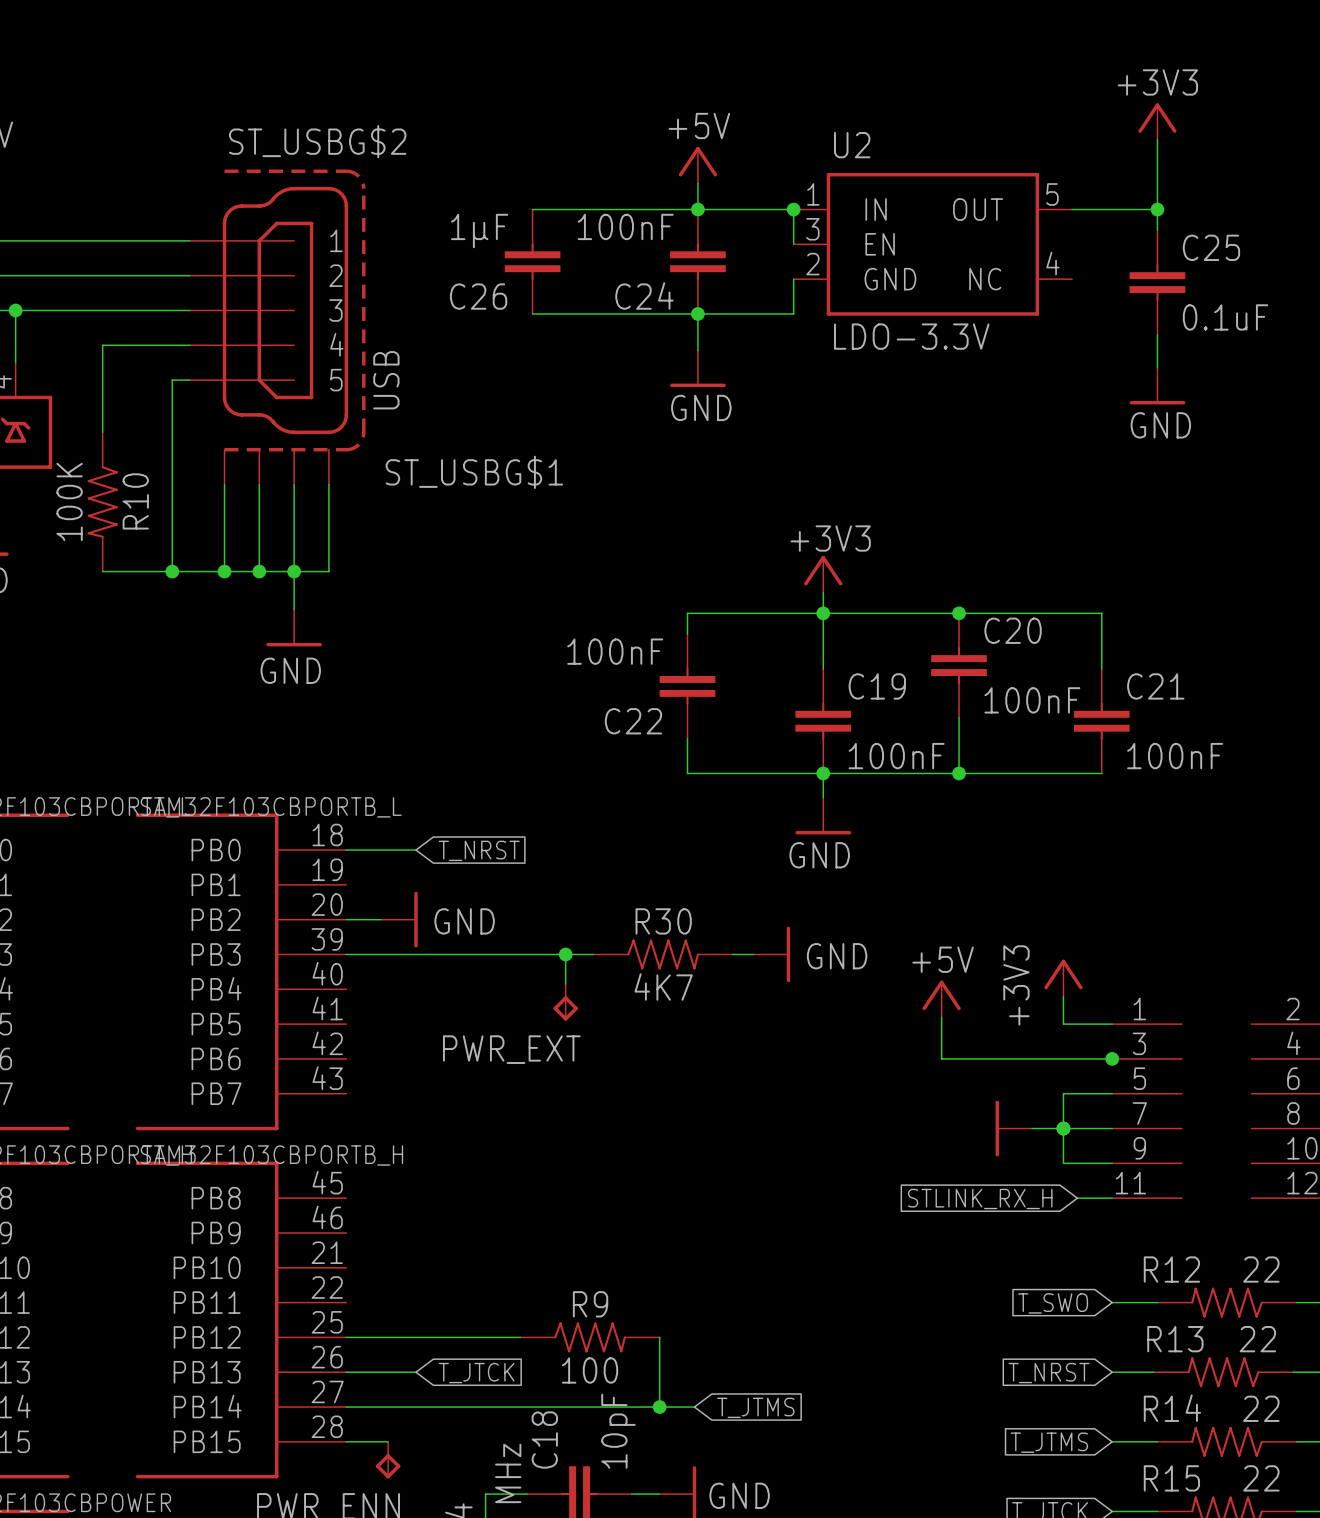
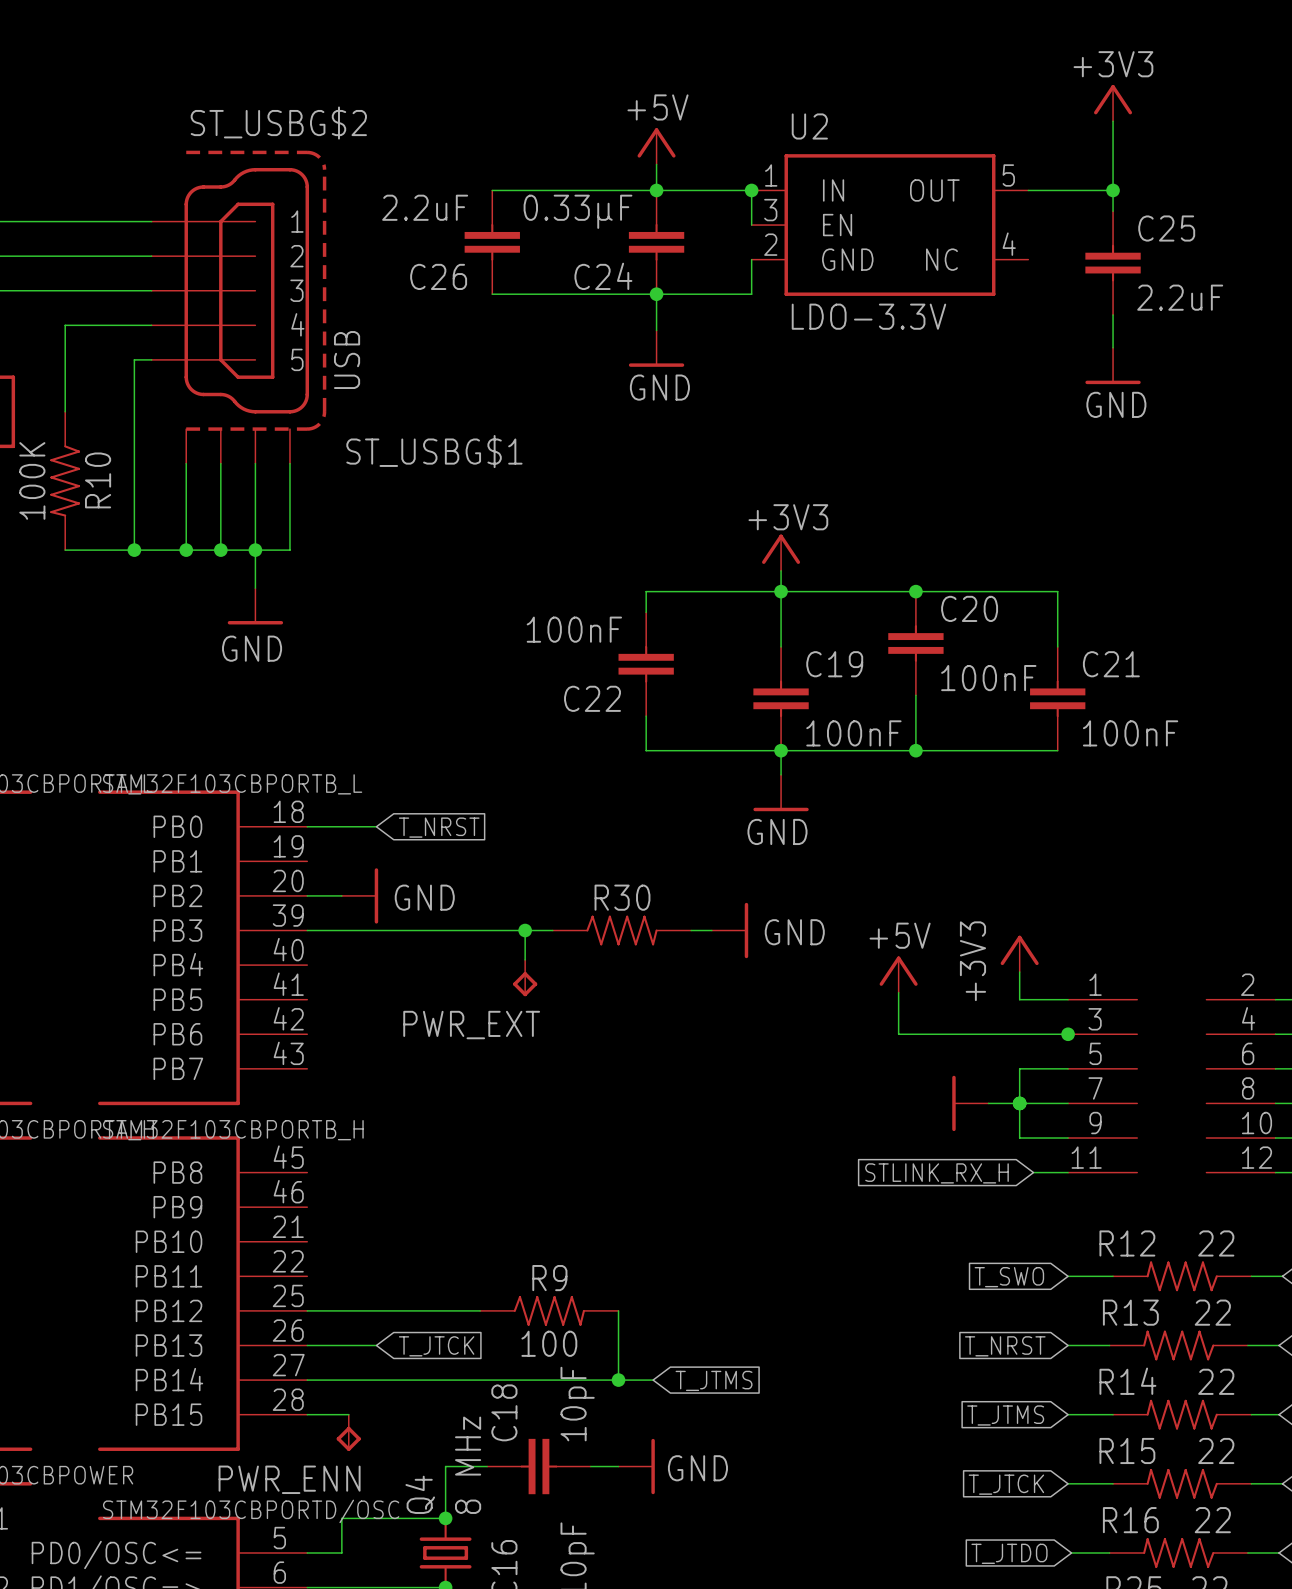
C24 value: 100nF (625, 226) -> 0.33µF (577, 211)
C26 value: 1µF (479, 231) -> 2.2uF (425, 207)
C25 value: 0.1uF (1225, 317) -> 2.2uF (1180, 297)
R30 value: 4K7 (663, 986) -> none

